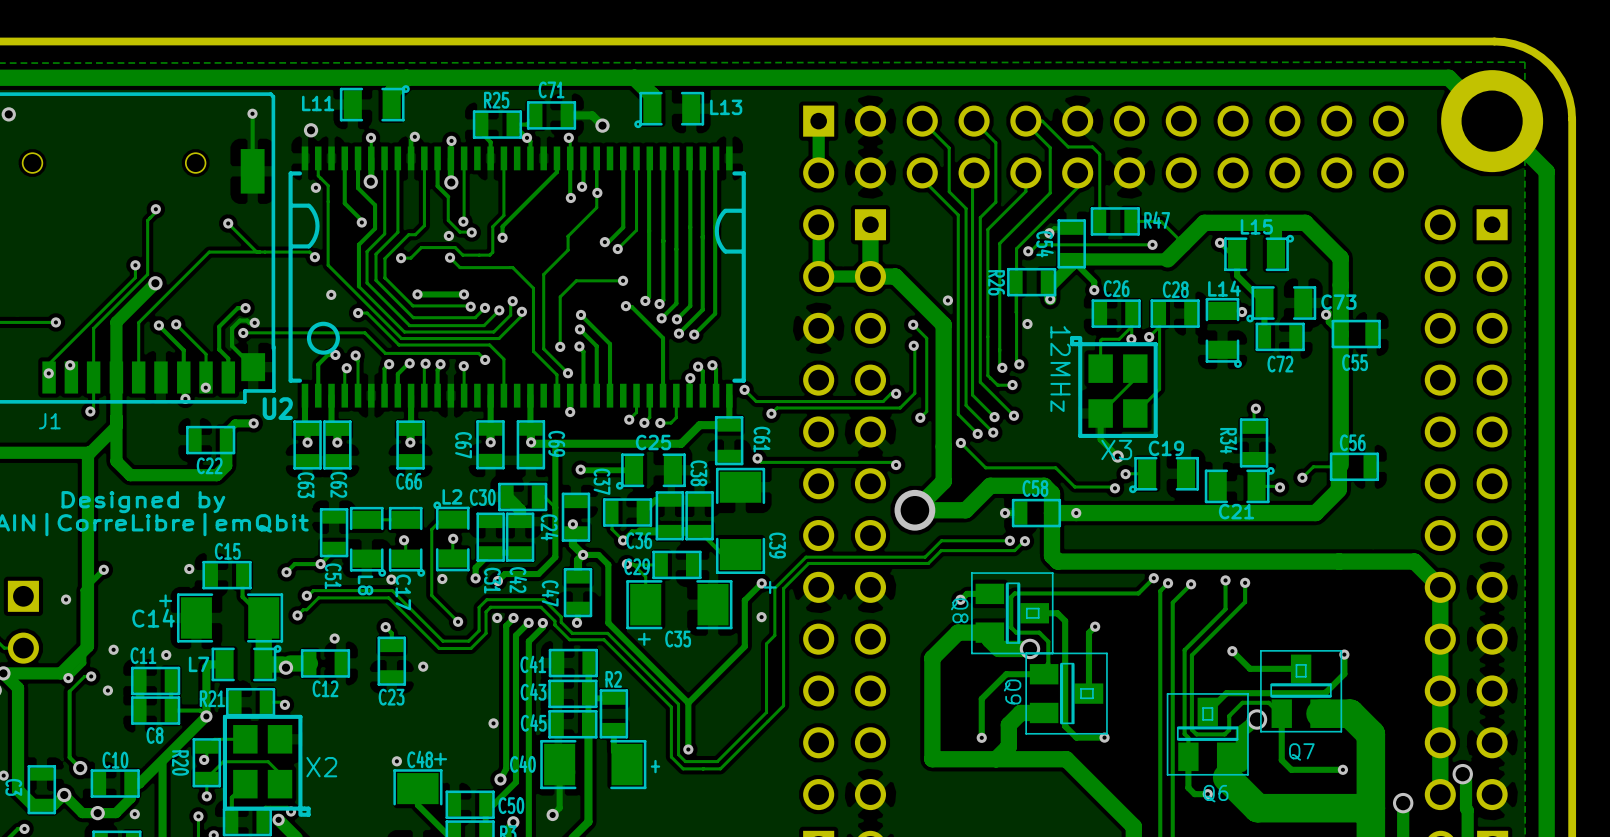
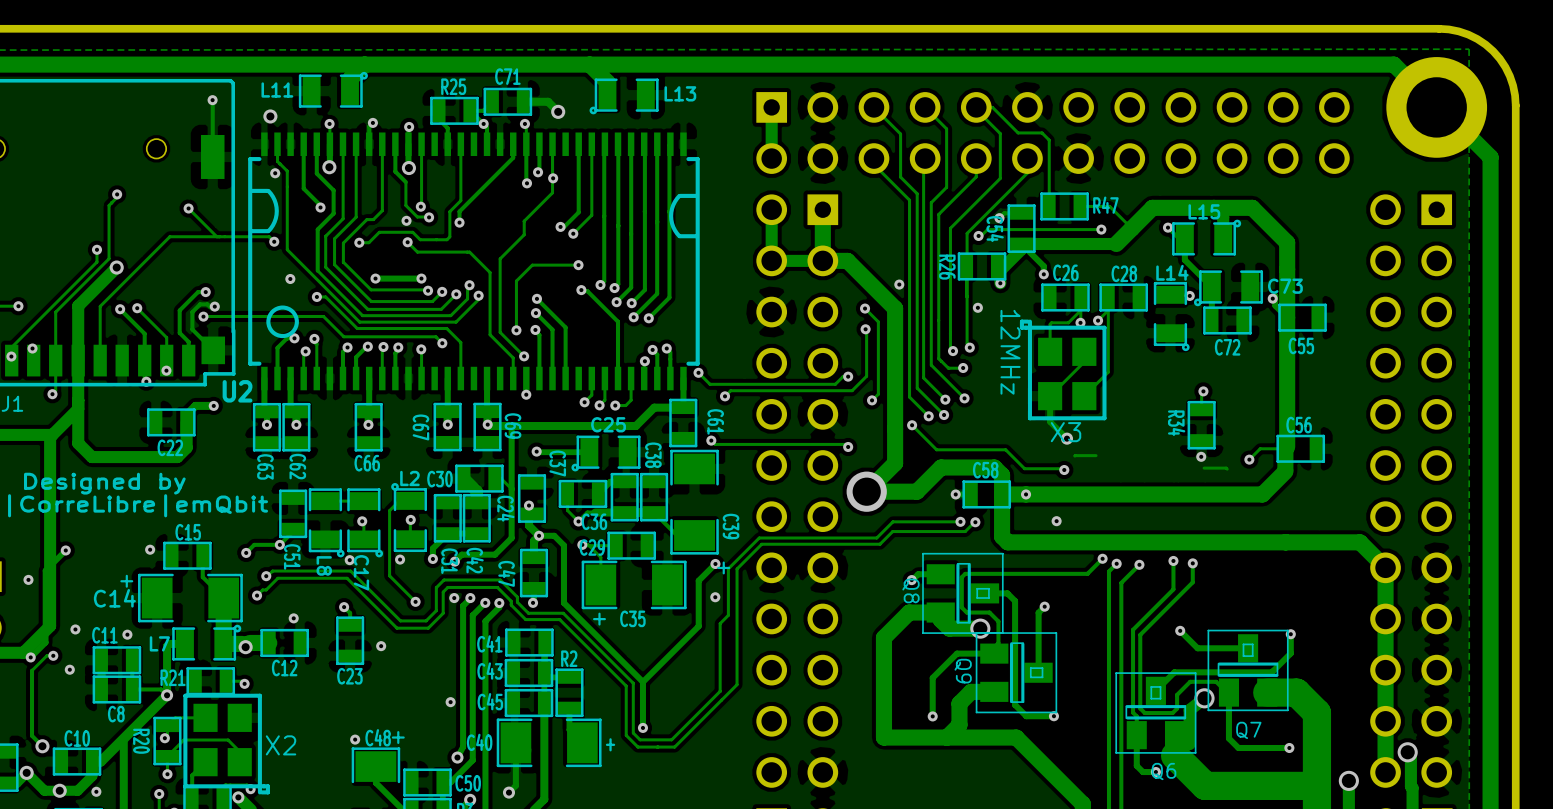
via: (1125, 474) -> none
C19: (1163, 475) -> none
C21: (1239, 485) -> none
via position: (1279, 487) -> (1201, 456)
via: none -> (1056, 521)

